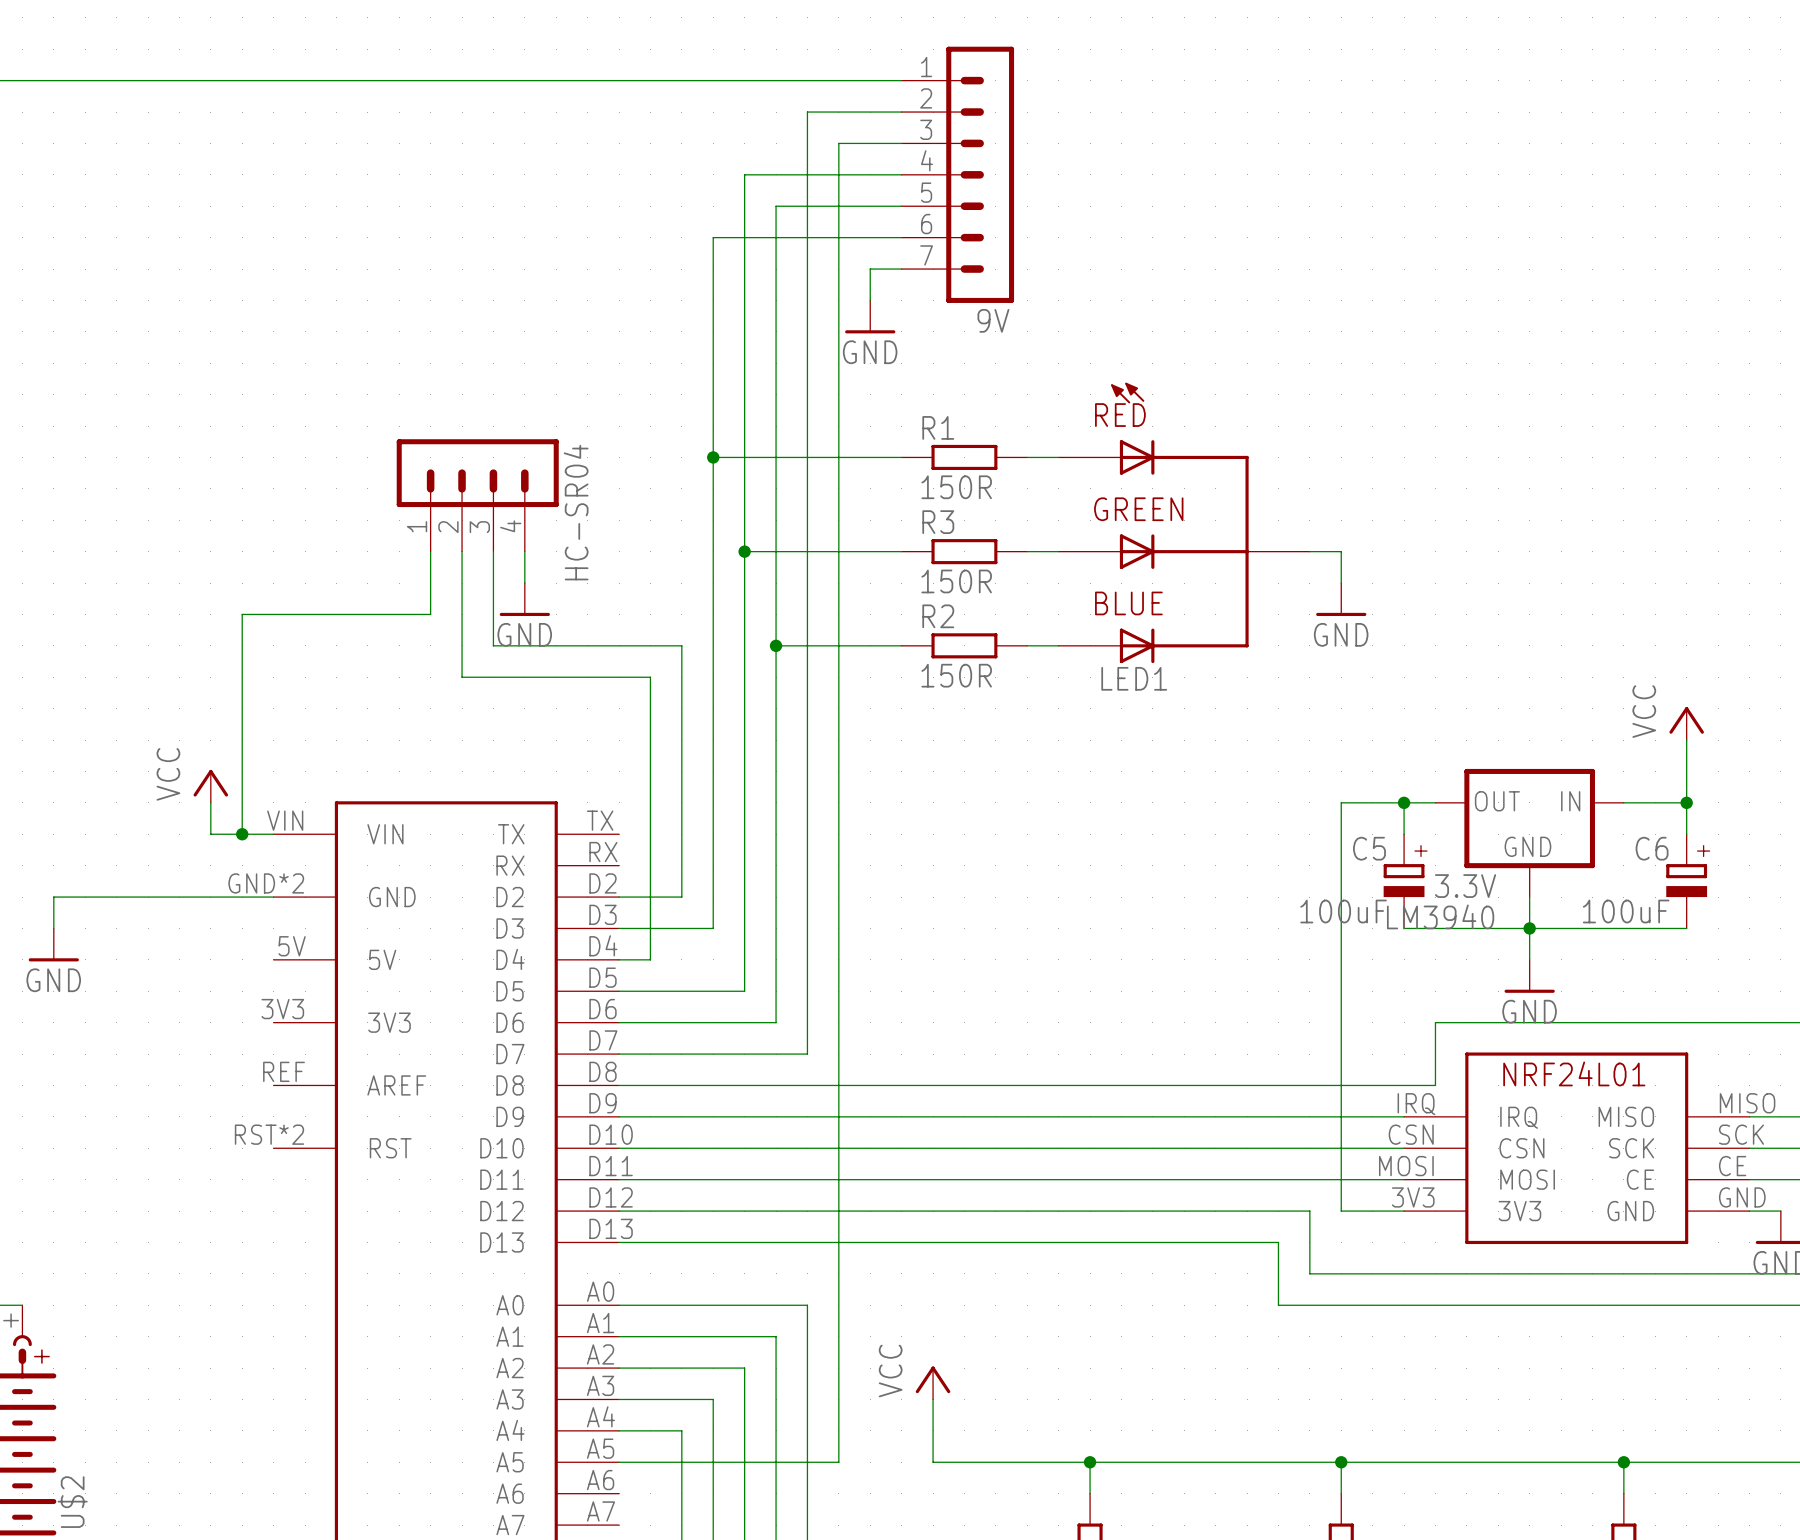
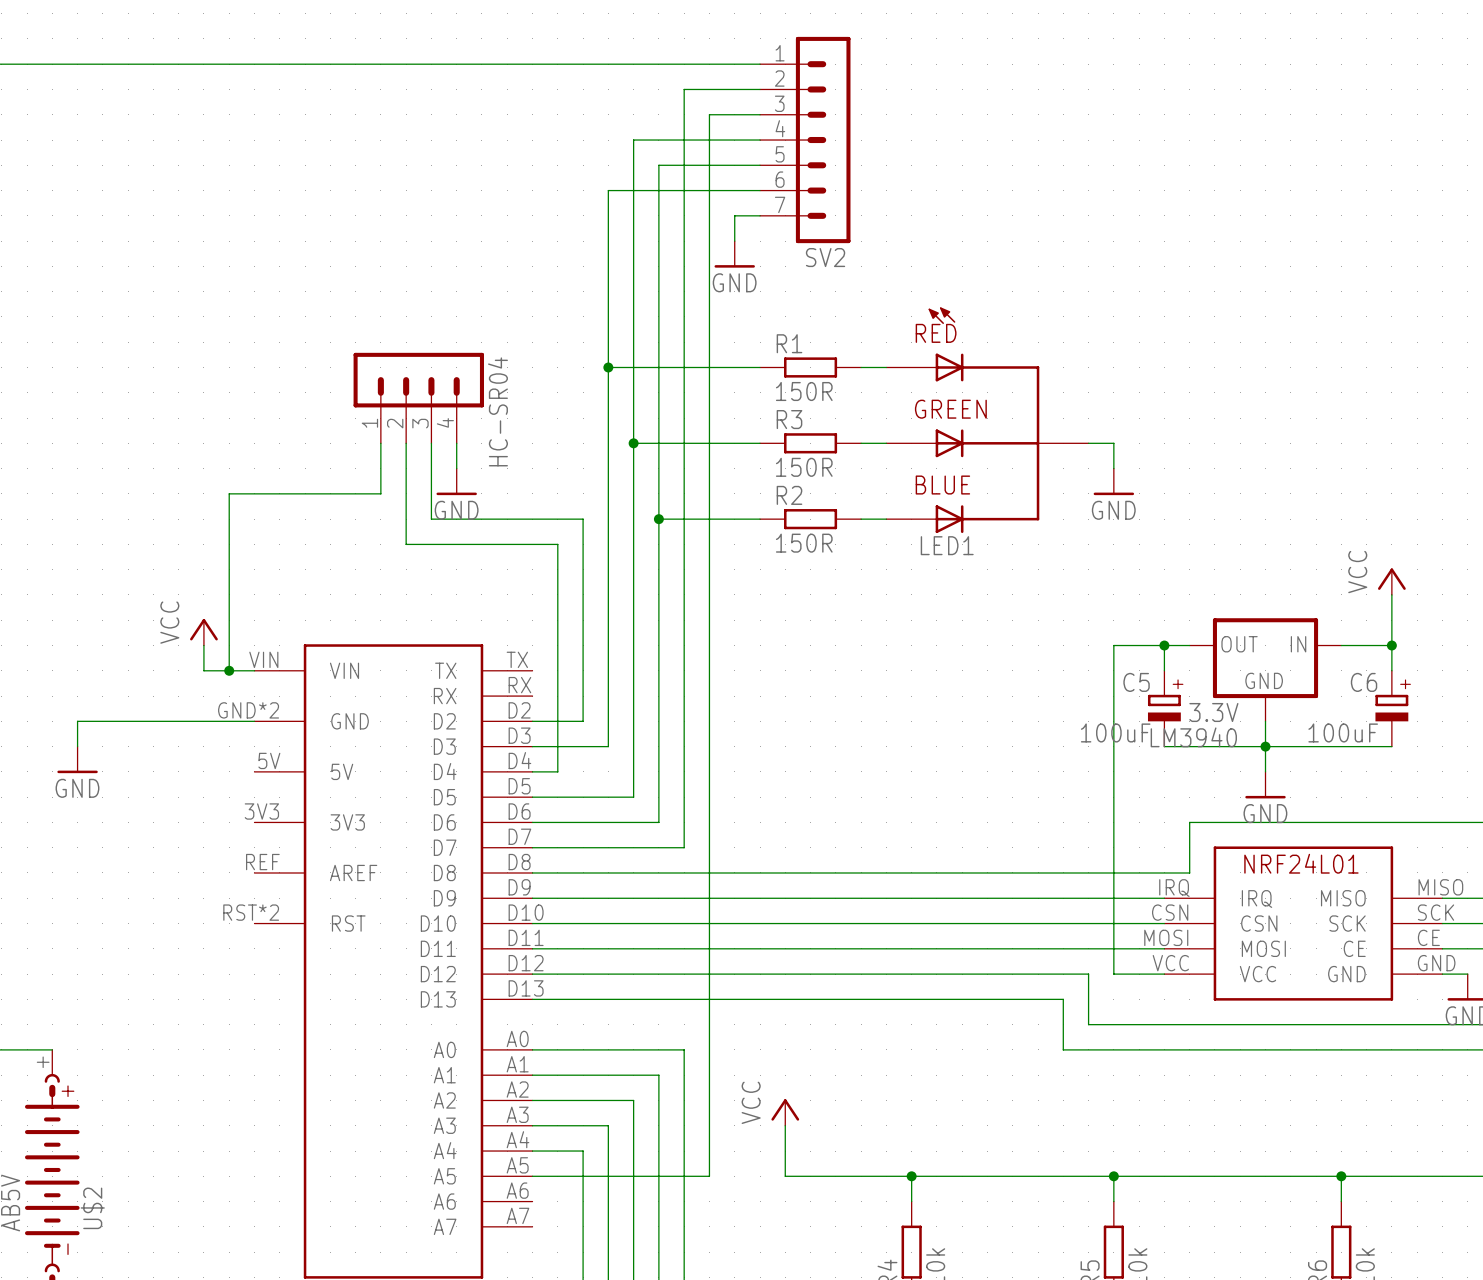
9V name: 9V (993, 320) -> SV2 (825, 257)
part pin number: 3V3 (1413, 1197) -> VCC (1170, 963)
part pin name: 3V3 (1519, 1211) -> VCC (1257, 974)

